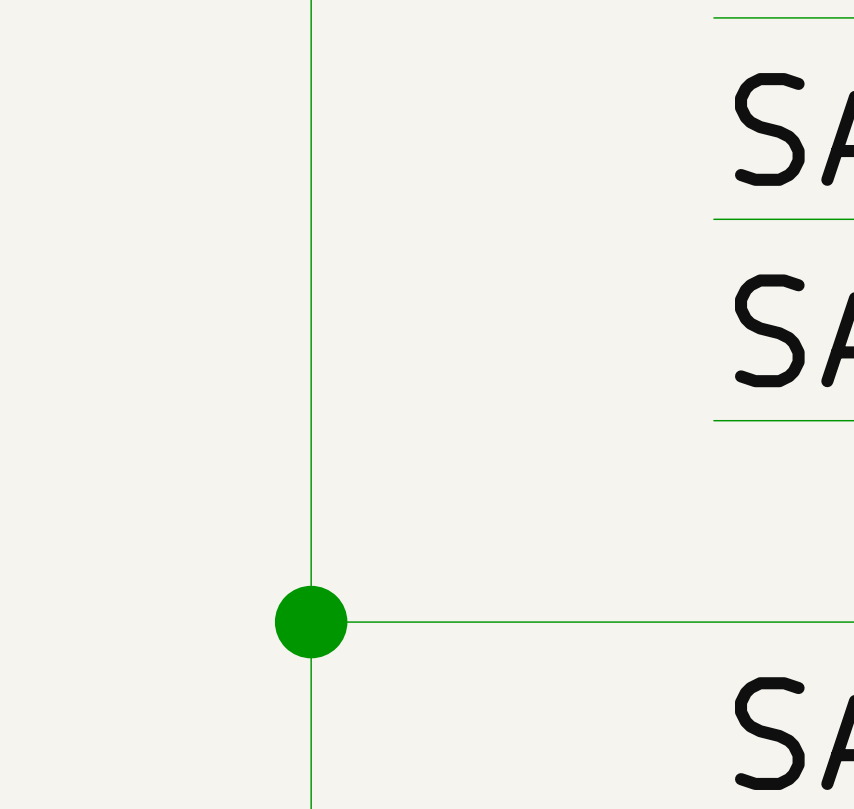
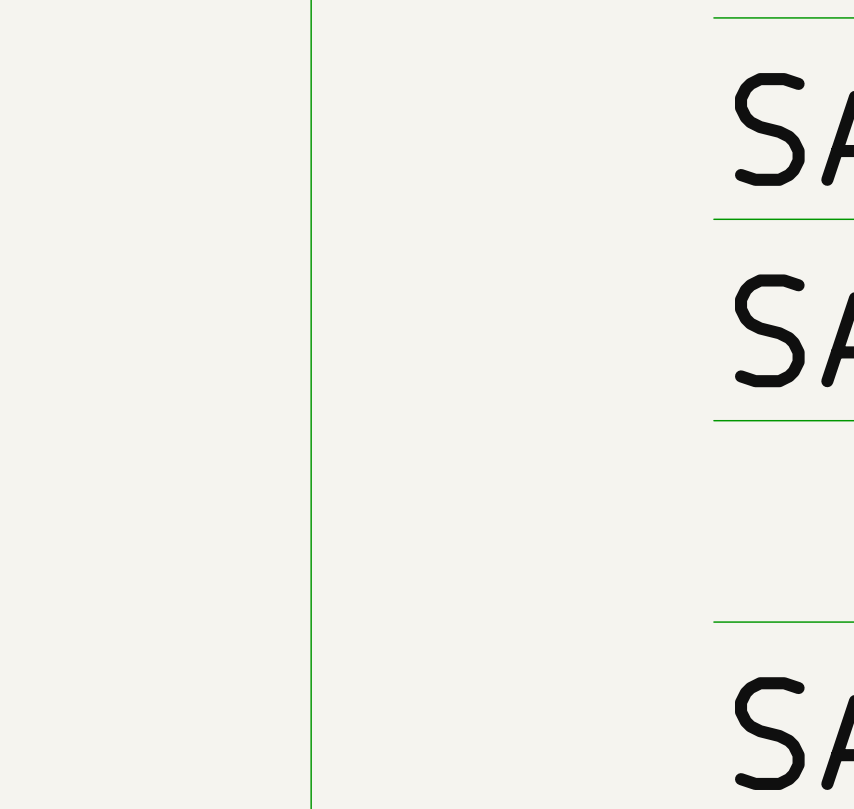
wire: (311, 622) (713, 622) -> none
junction: (311, 622) -> none

